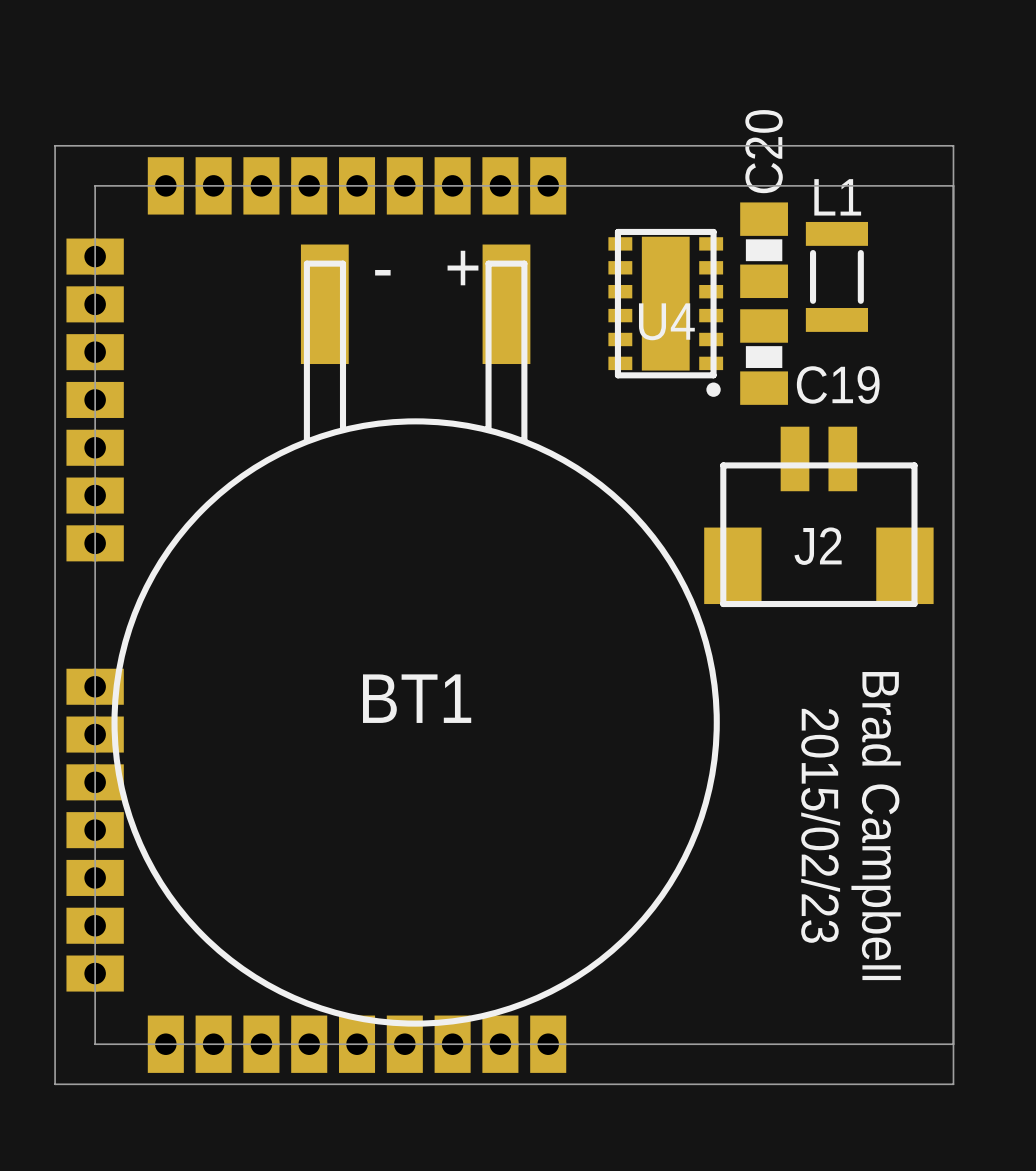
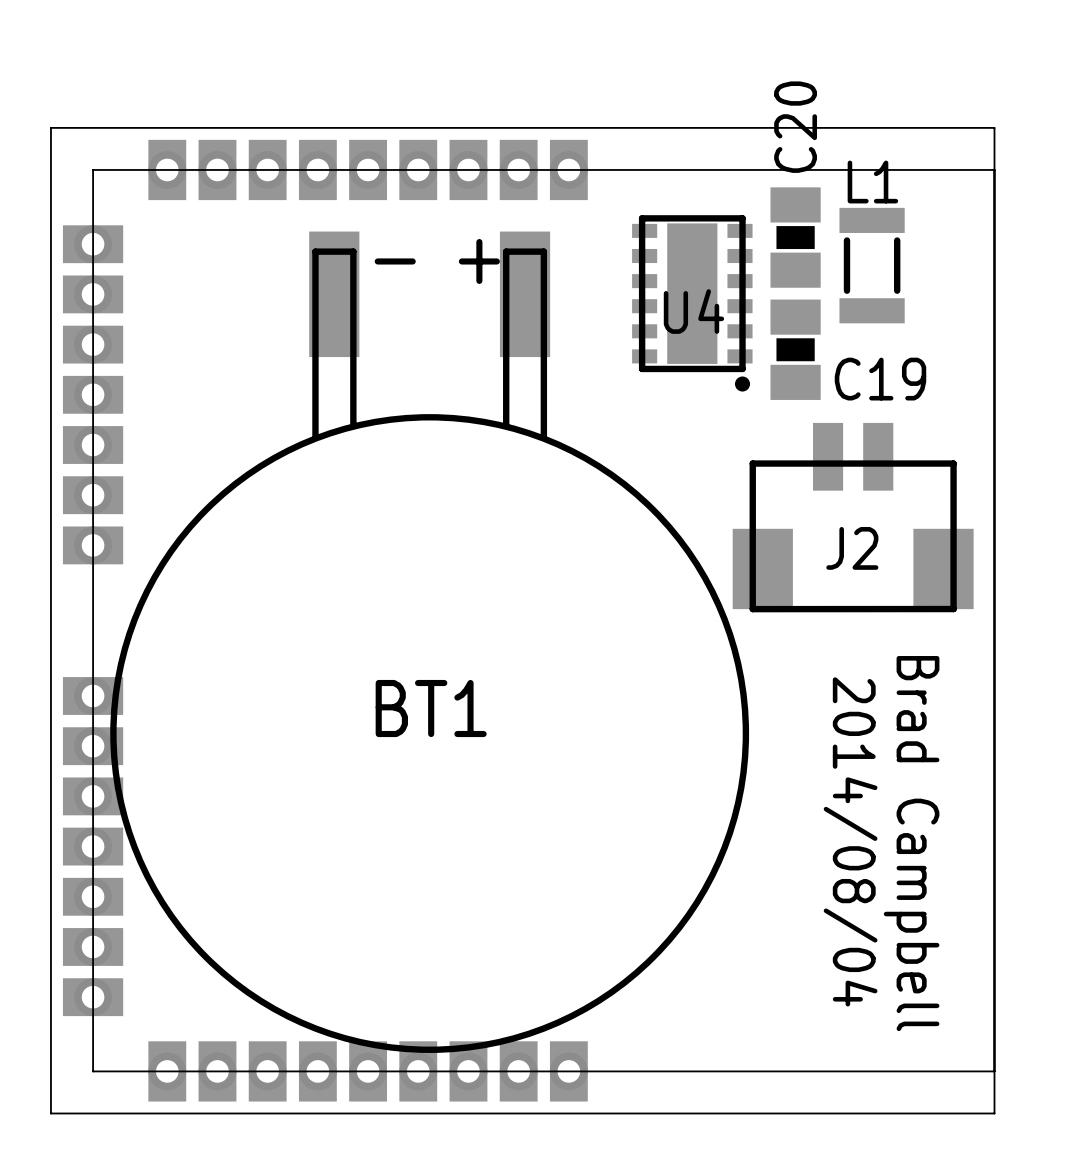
text: 2015/02/23 (820, 825) -> 2014/08/04 (850, 841)

